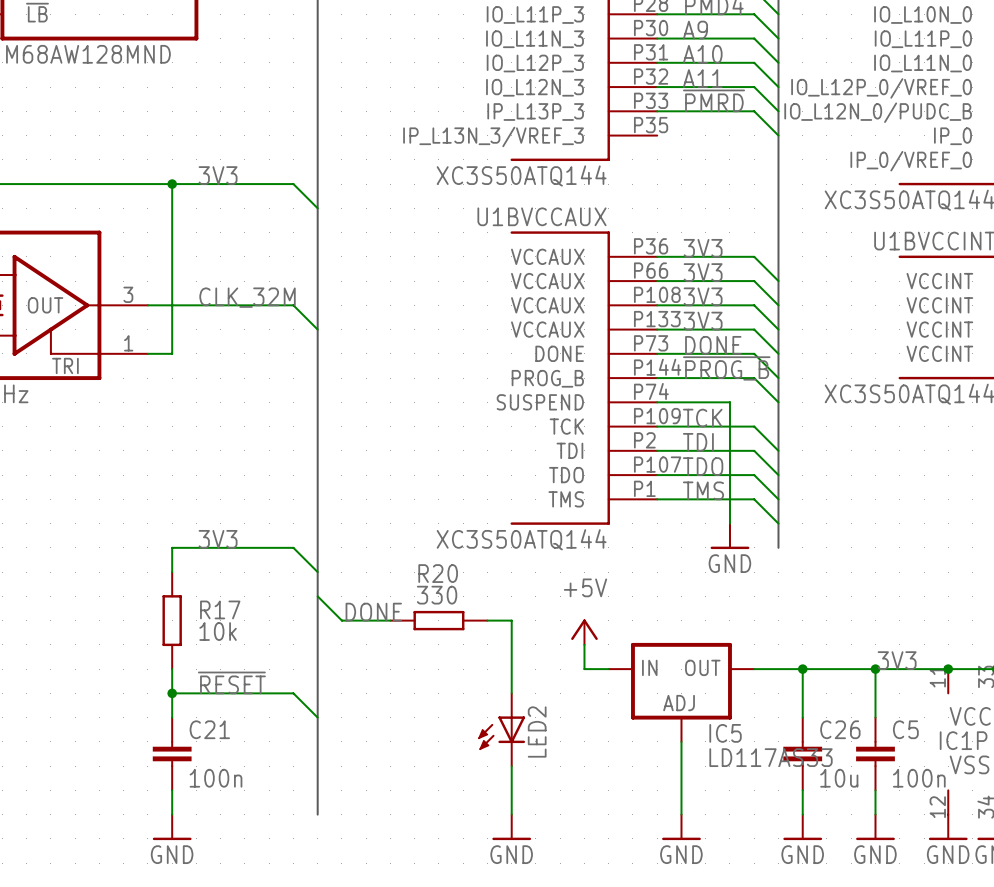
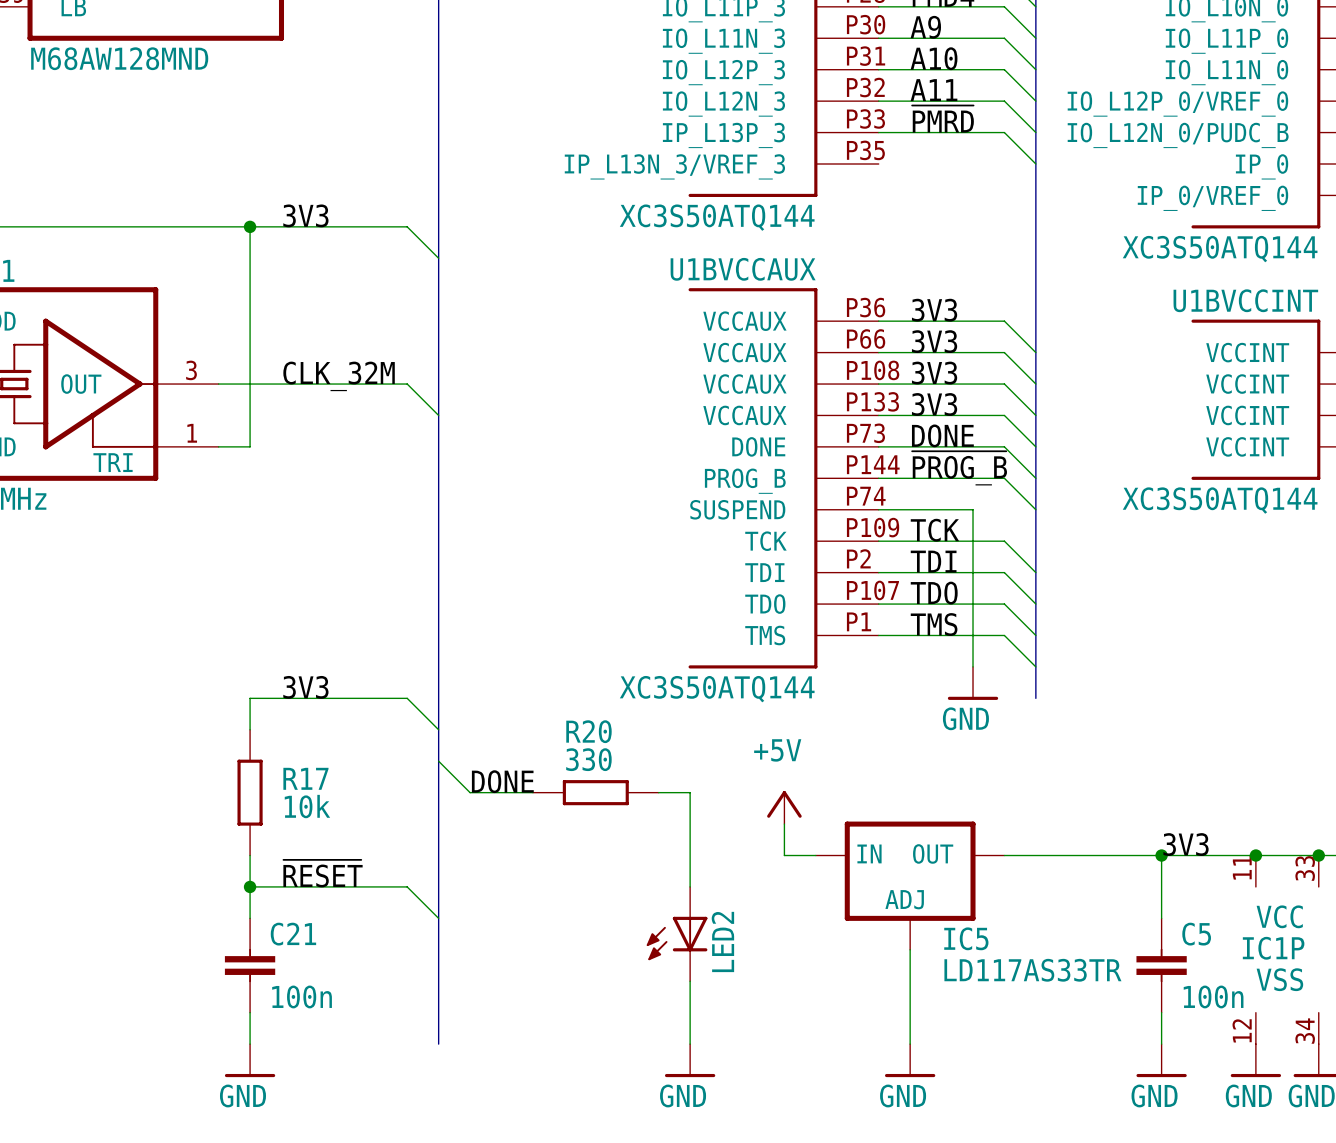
wire: (802, 669) (802, 717) -> none
junction: (802, 669) -> none
C26: 10u (802, 753) -> none
IC5 value: LD117AS33 (771, 757) -> LD117AS33TR (1032, 970)
wire: (802, 790) (802, 814) -> none
power symbol: GND (802, 827) -> none

